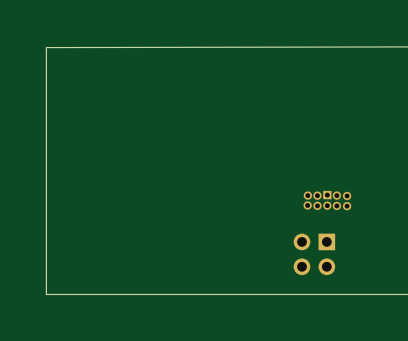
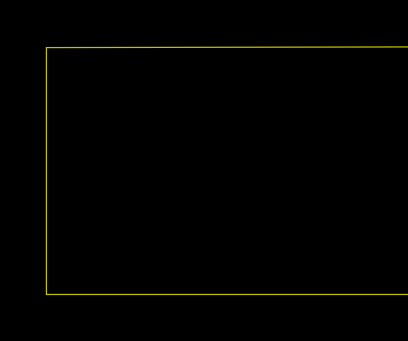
part: (327, 200) -> none
part: (314, 254) -> none

